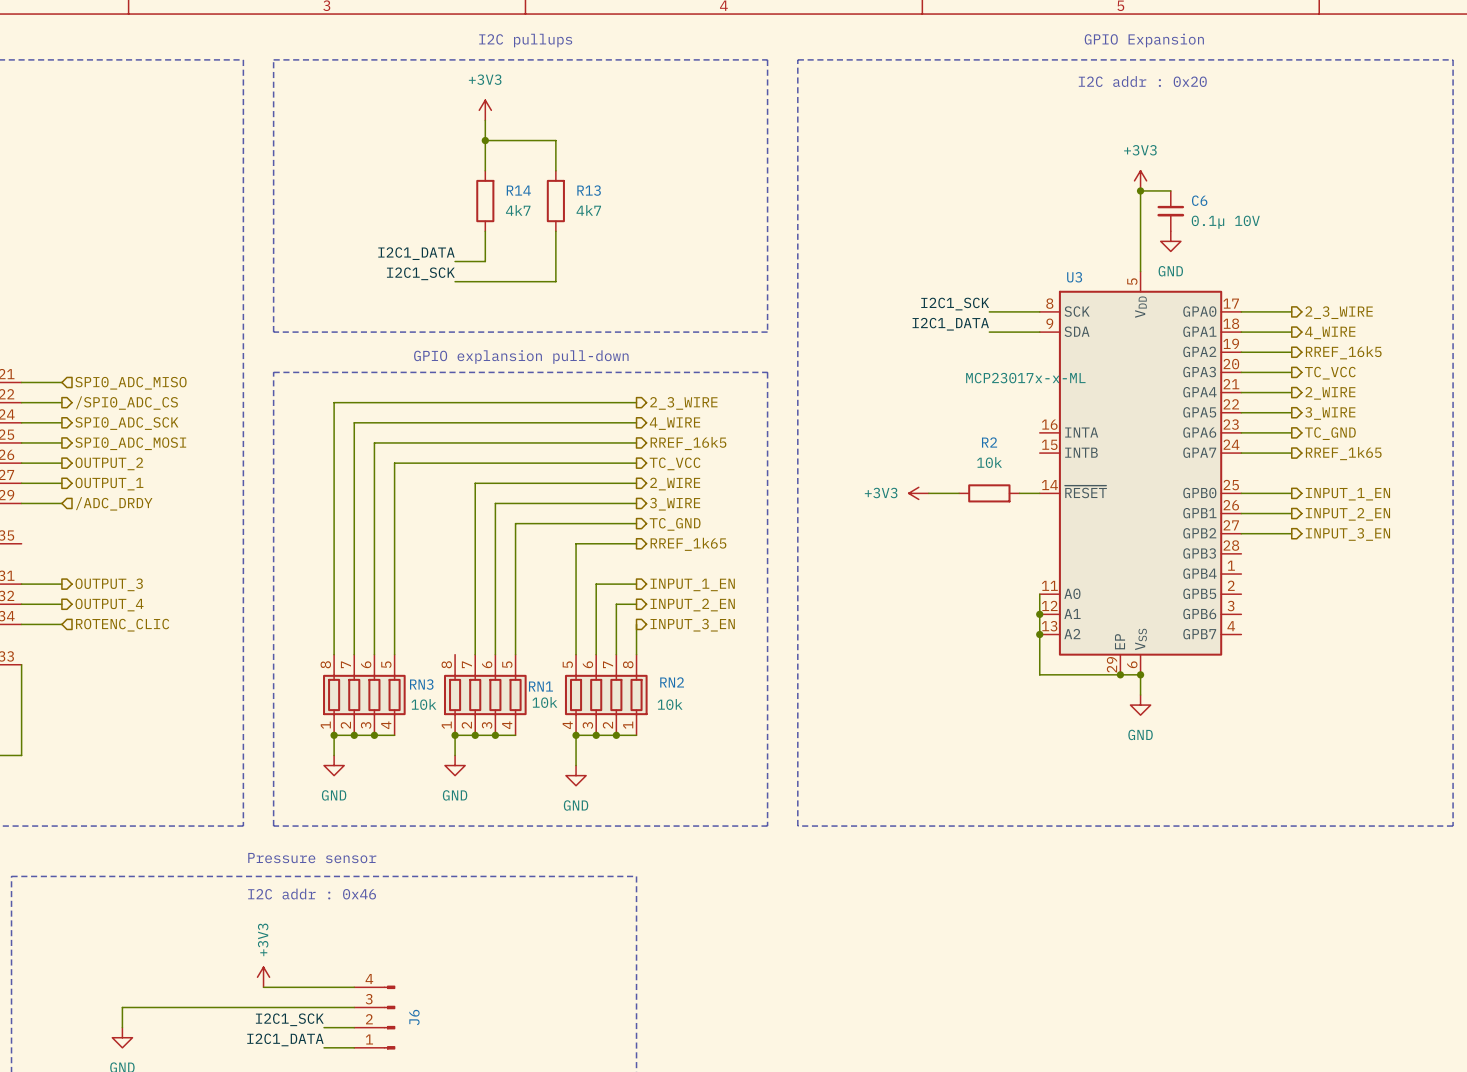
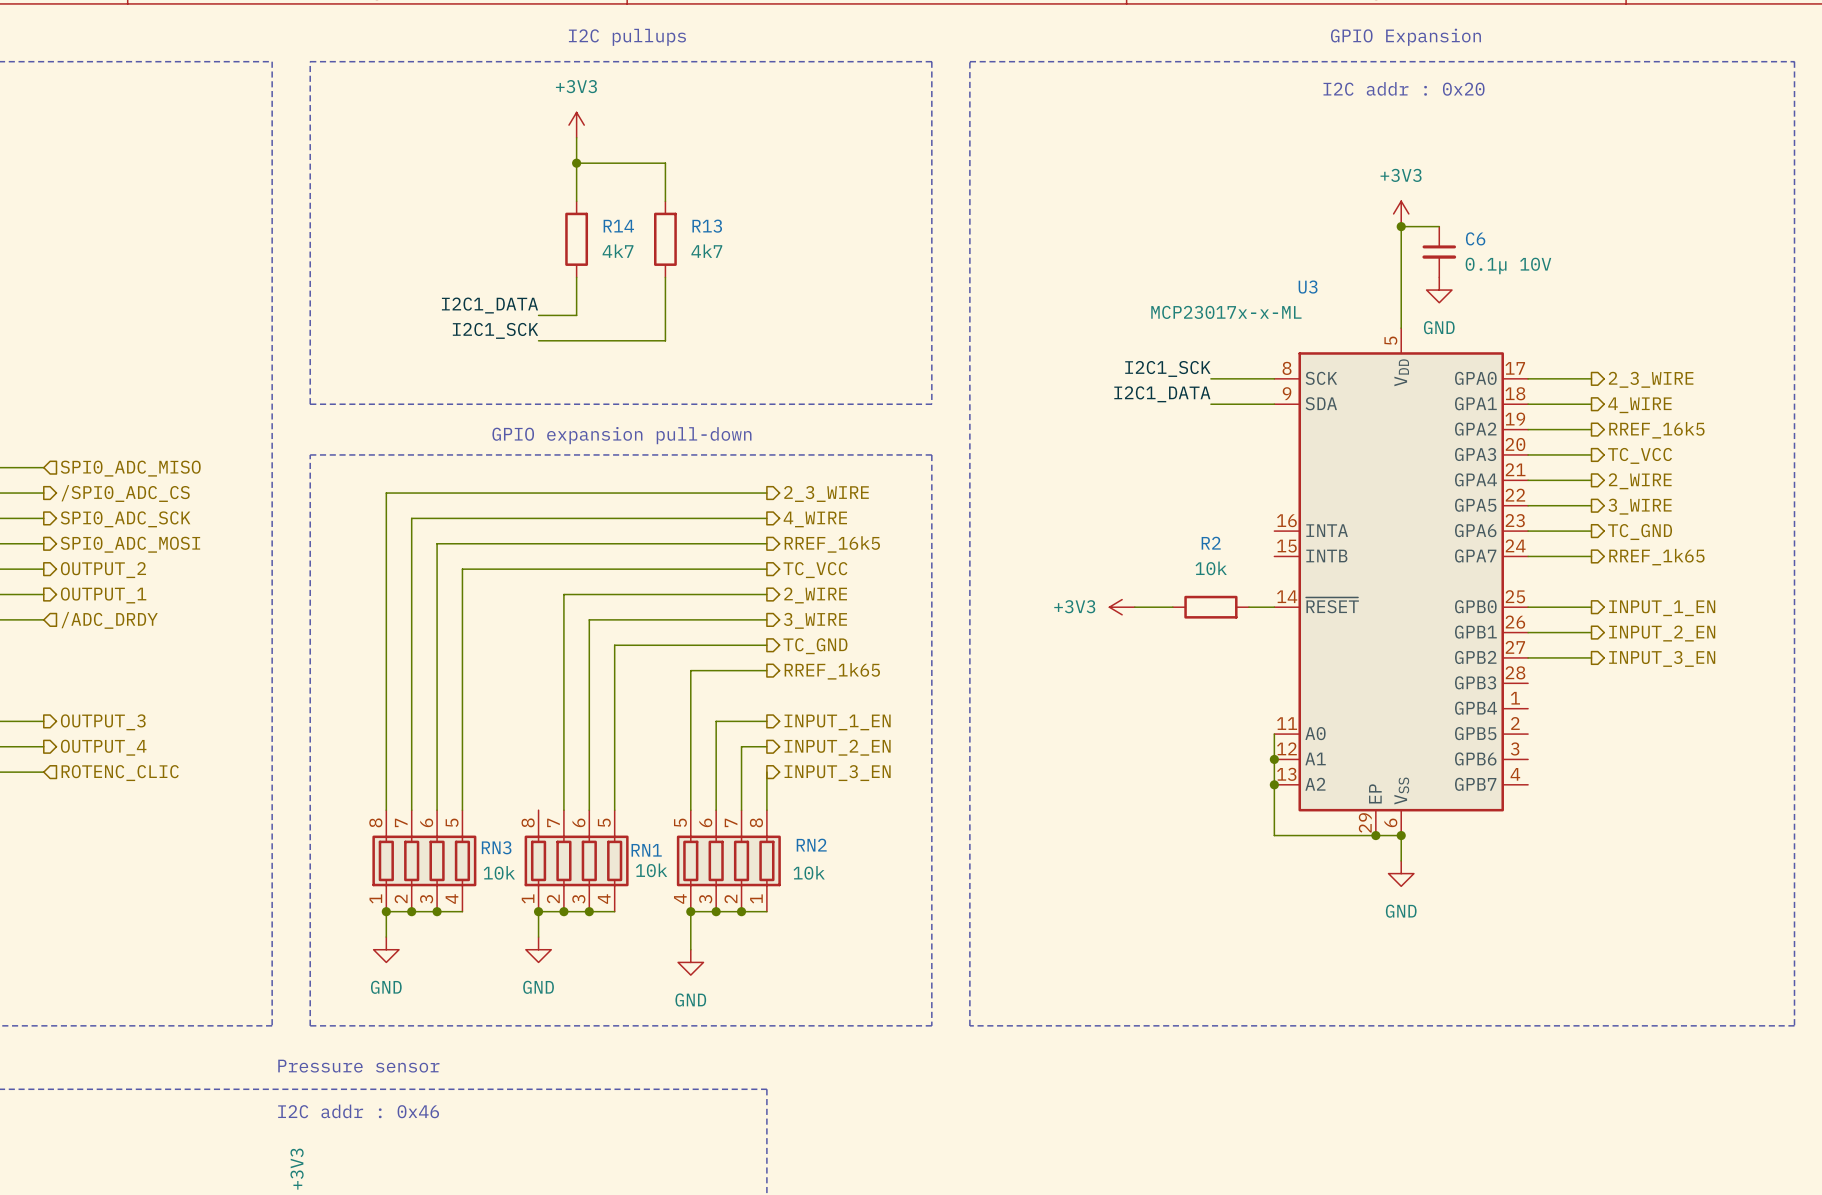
U3 name position: U3 (1074, 277) -> U3 (1308, 287)
text: GPIO explansion pull-down (521, 357) -> GPIO expansion pull-down (621, 435)
U3 value position: MCP23017x-x-ML (1025, 378) -> MCP23017x-x-ML (1226, 312)

